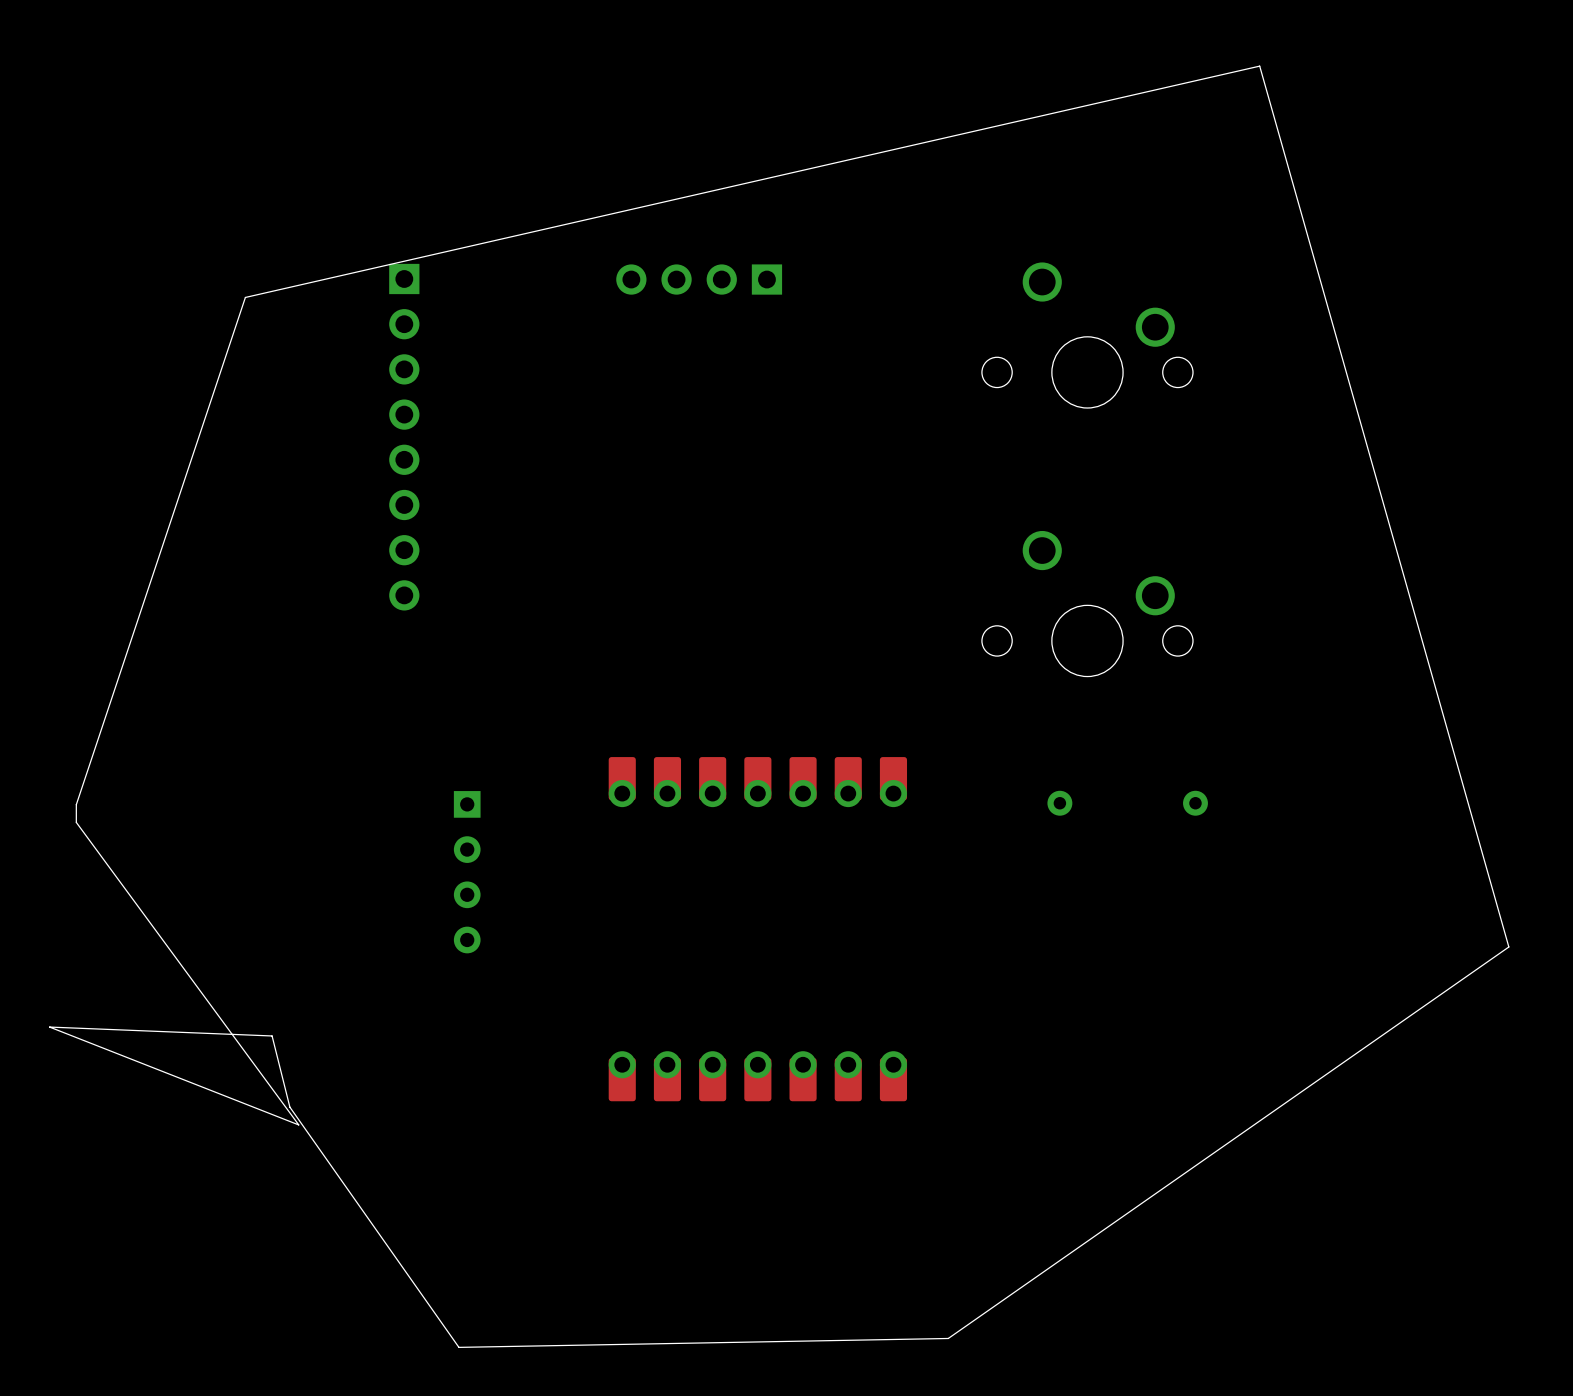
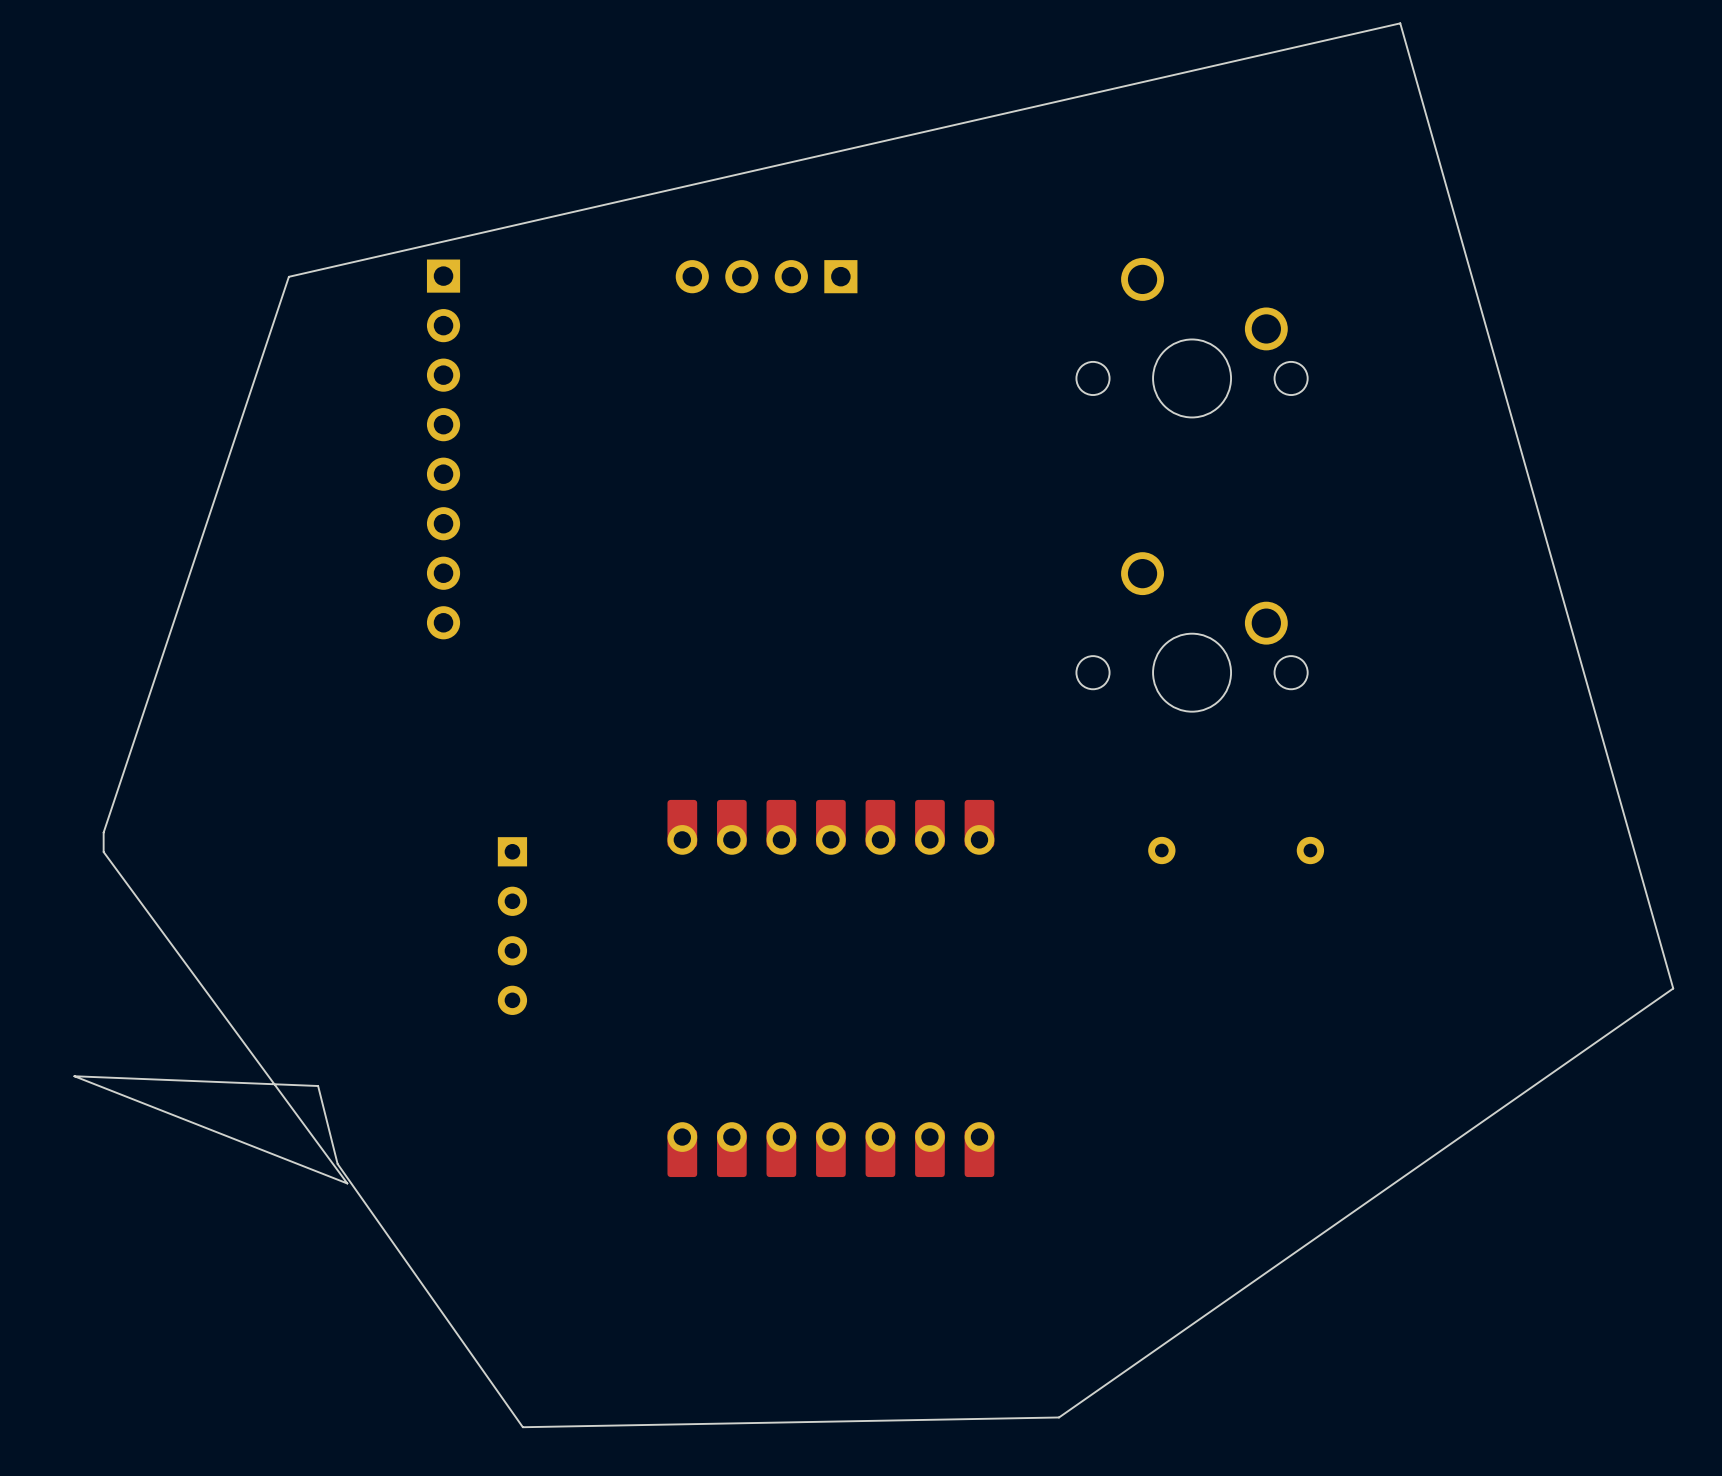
board edge: (1259, 66) (1508, 946) (948, 1338) (458, 1347) (289, 1107) (272, 1035) (49, 1027) (298, 1124) (76, 822) (76, 804) (245, 297) (1259, 66) -> (1400, 23) (1673, 988) (1059, 1417) (522, 1427) (337, 1164) (318, 1086) (74, 1076) (347, 1183) (103, 852) (103, 832) (288, 276) (1400, 23)

